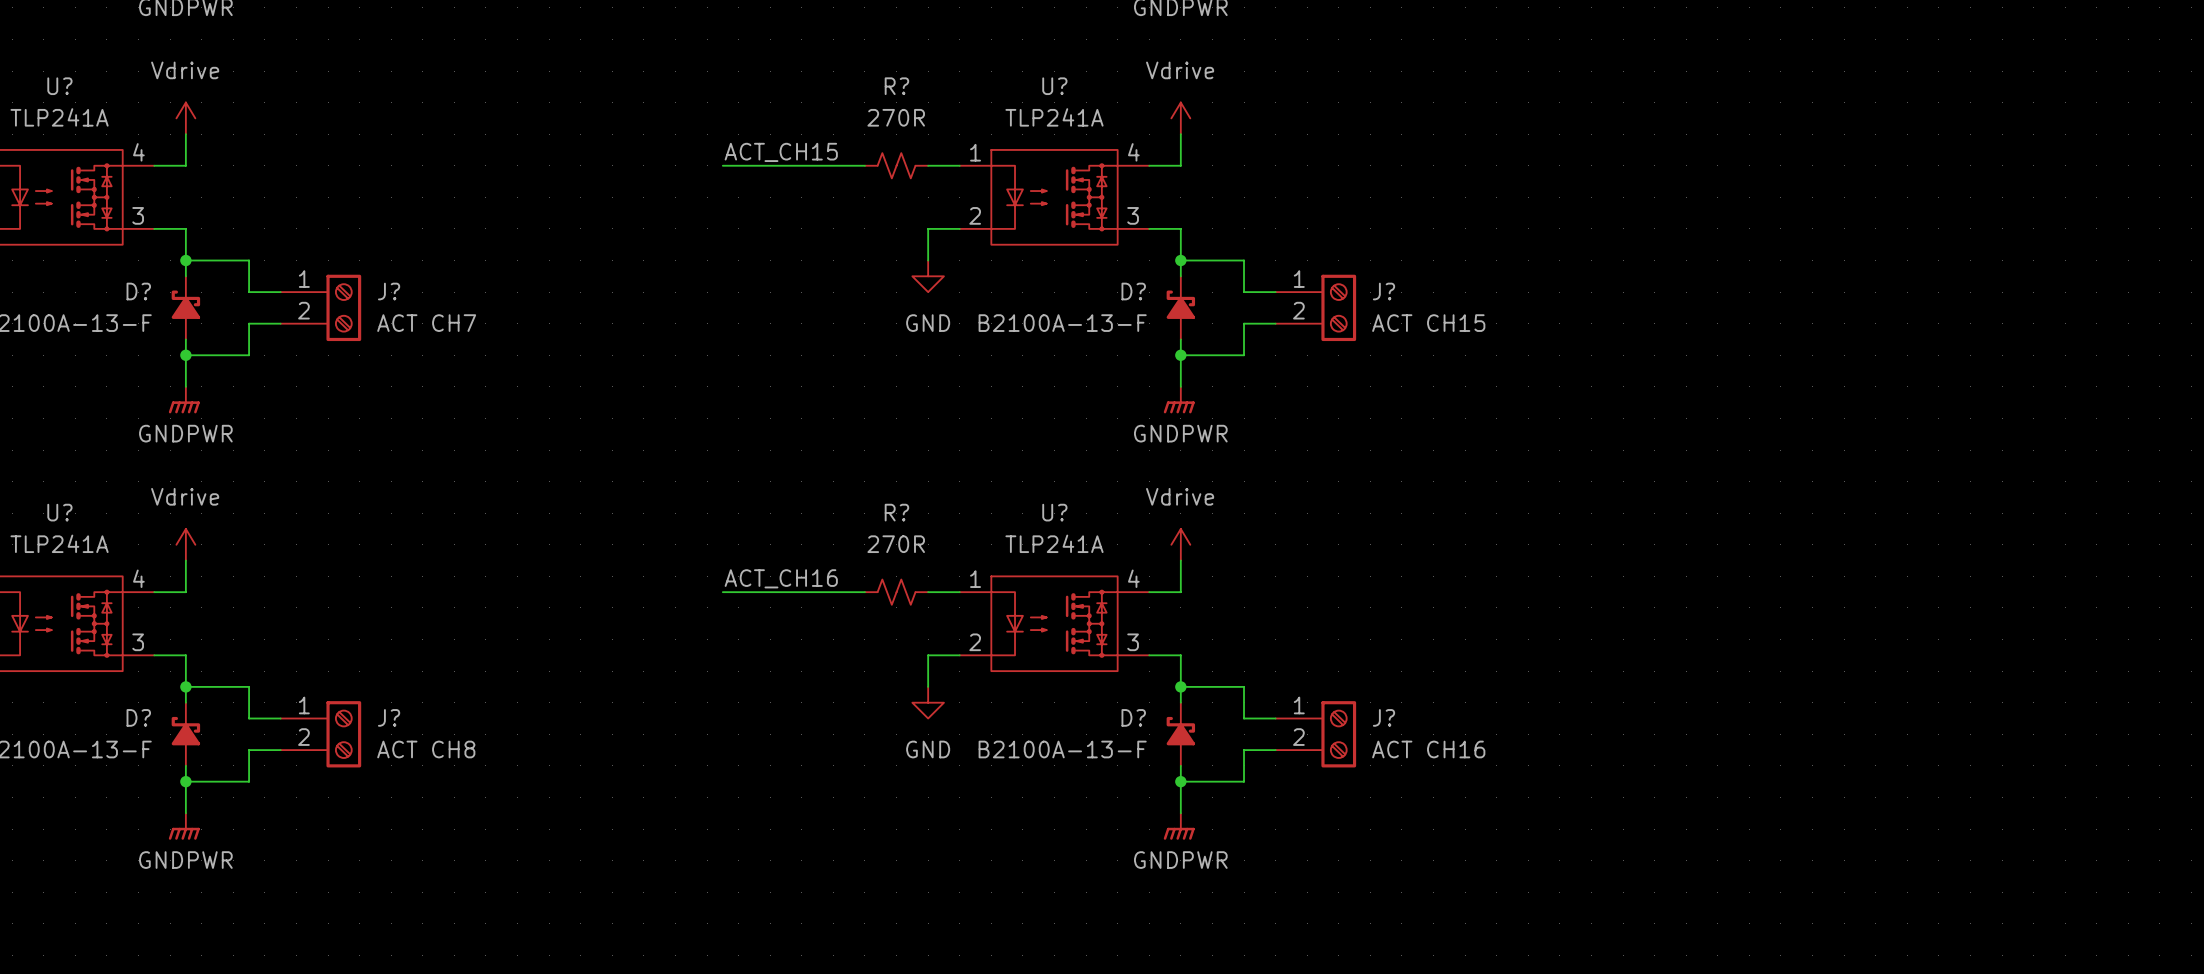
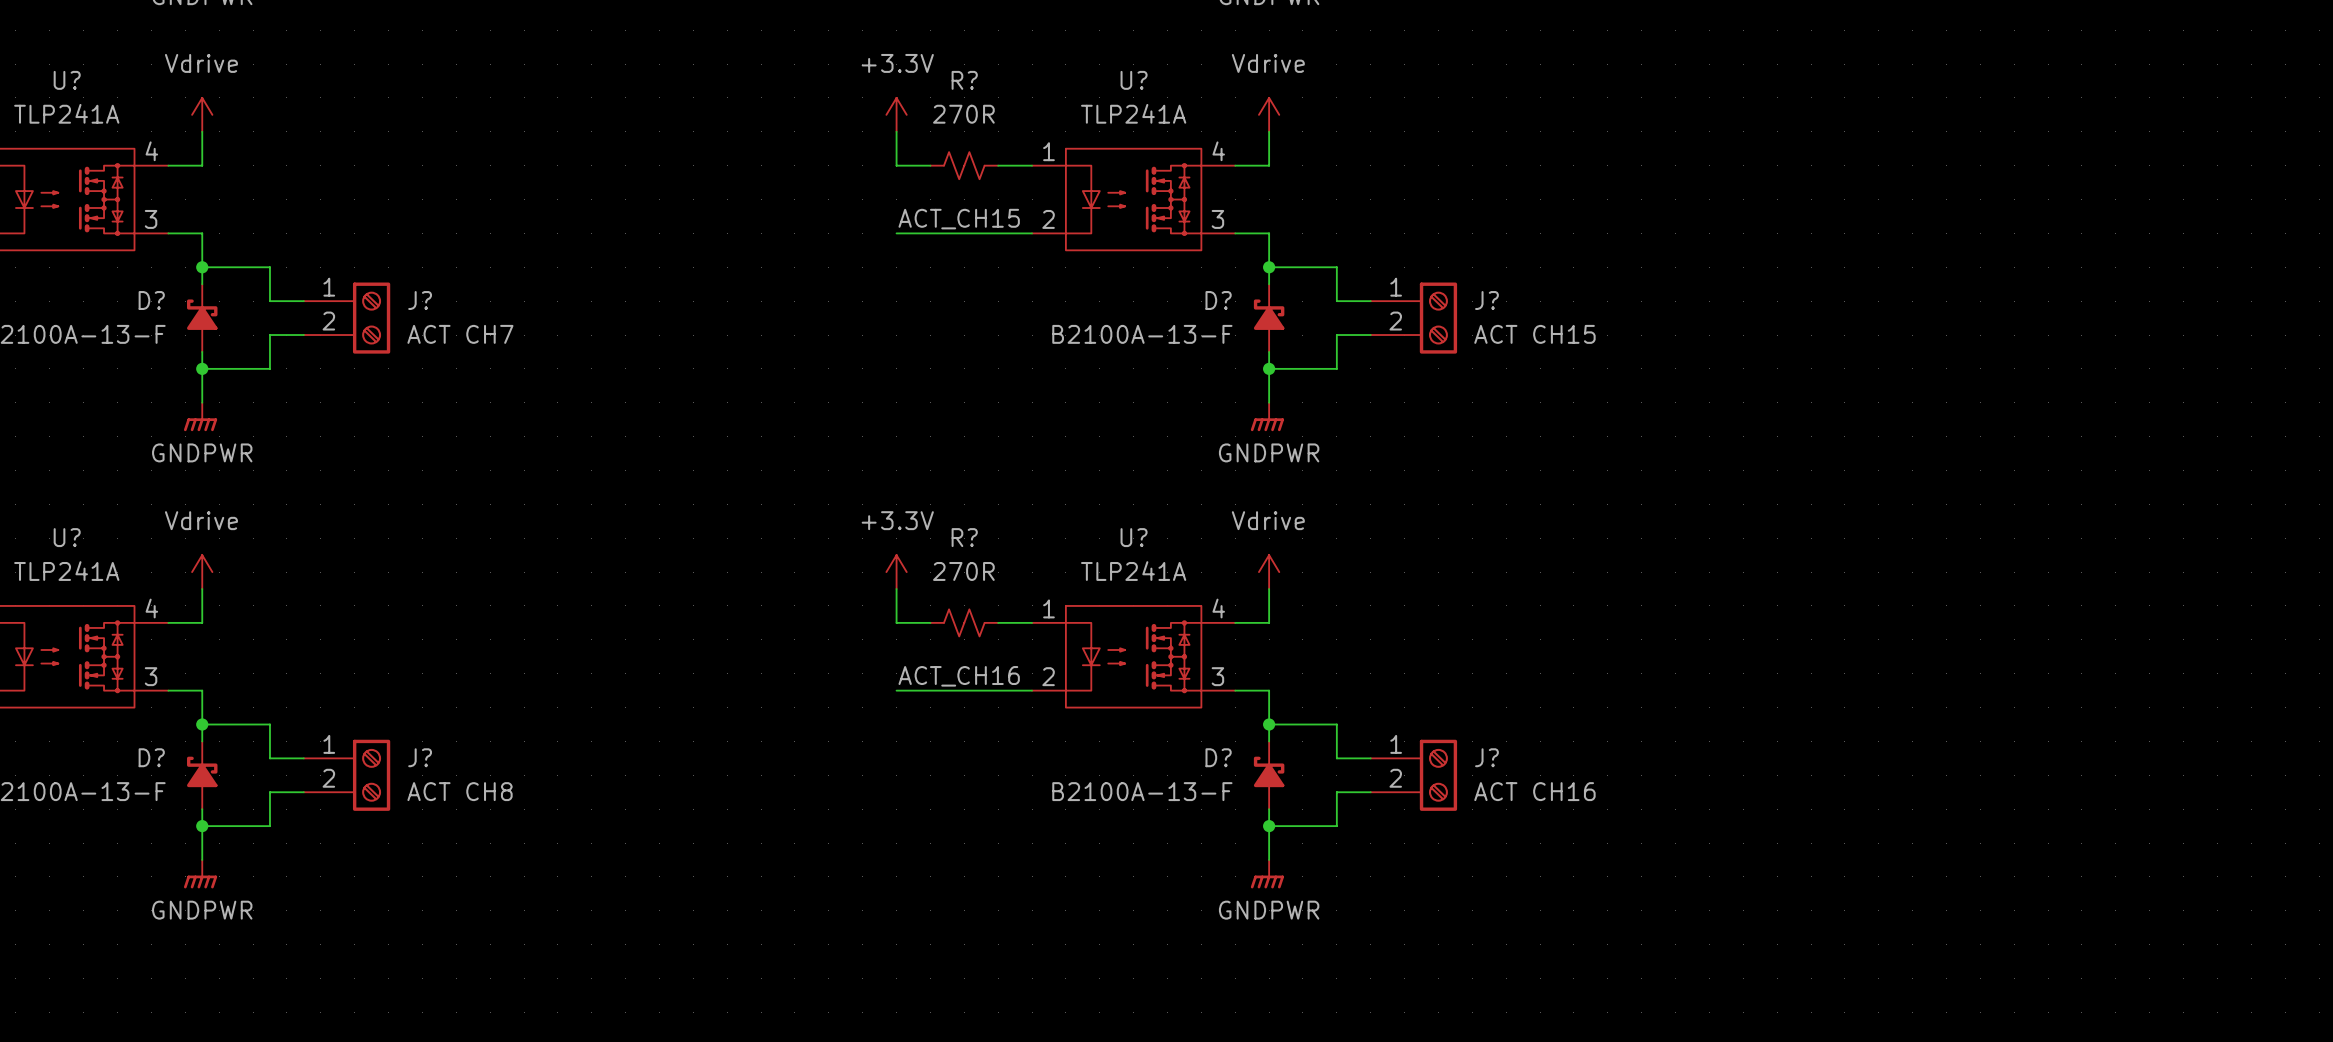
power symbol: none -> +3.3V (896, 114)
label position: ACT_CH15 (781, 152) -> ACT_CH15 (959, 219)
wire: (722, 165) (833, 165) -> (896, 131) (896, 165)
wire: (928, 228) (928, 260) -> (998, 233) (896, 233)
power symbol: GND (928, 276) -> none
power symbol: none -> +3.3V (896, 572)
label position: ACT_CH16 (781, 578) -> ACT_CH16 (959, 676)
wire: (722, 592) (833, 592) -> (896, 589) (896, 622)
wire: (928, 655) (928, 686) -> (998, 690) (896, 690)
power symbol: GND (928, 702) -> none

